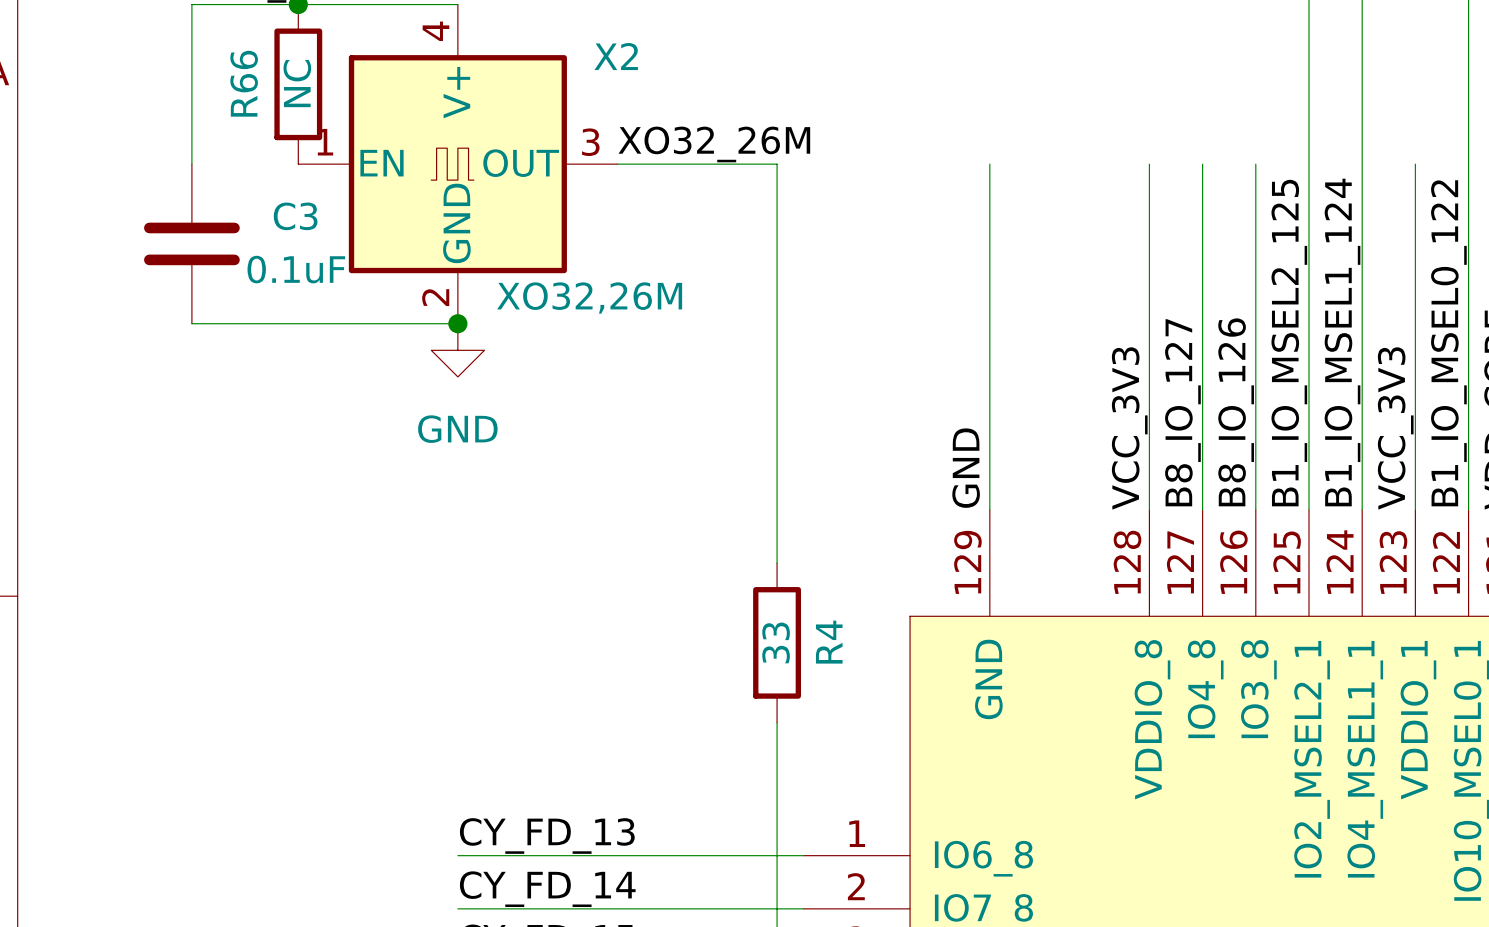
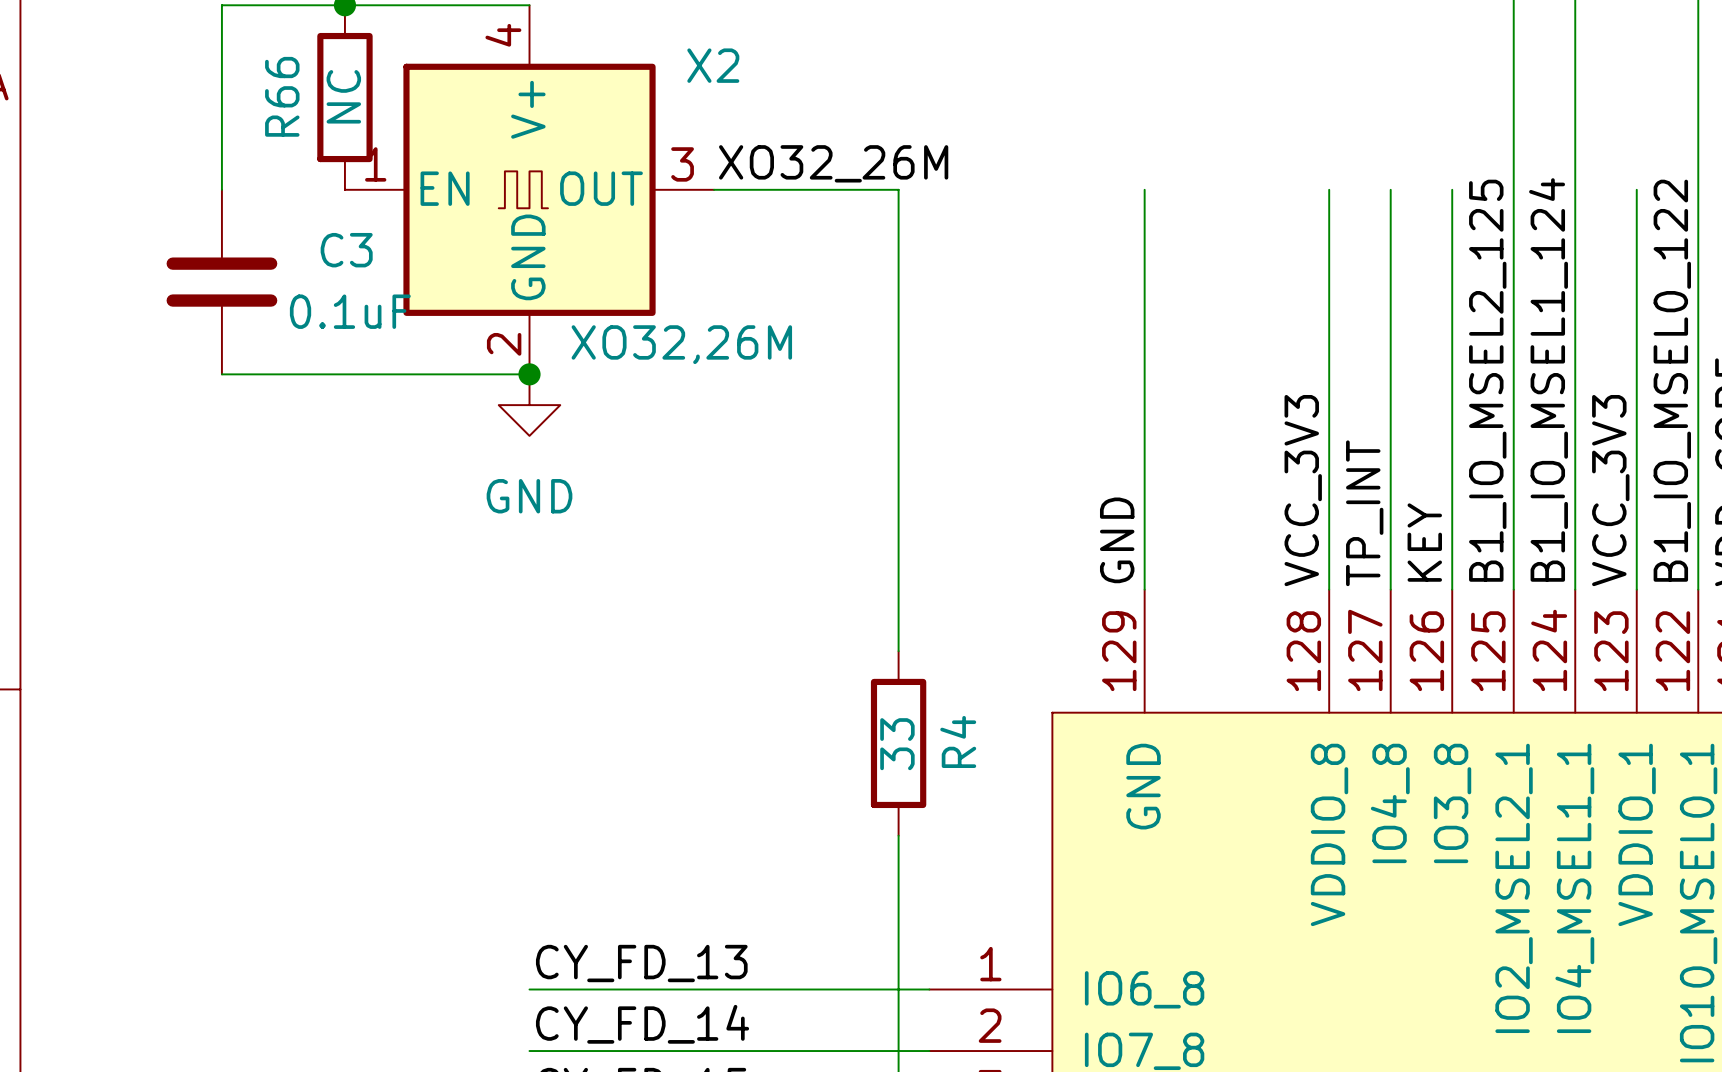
label: B8_IO_127 (1182, 412) -> TP_INT (1364, 513)
label: B8_IO_126 (1236, 412) -> KEY (1424, 542)

